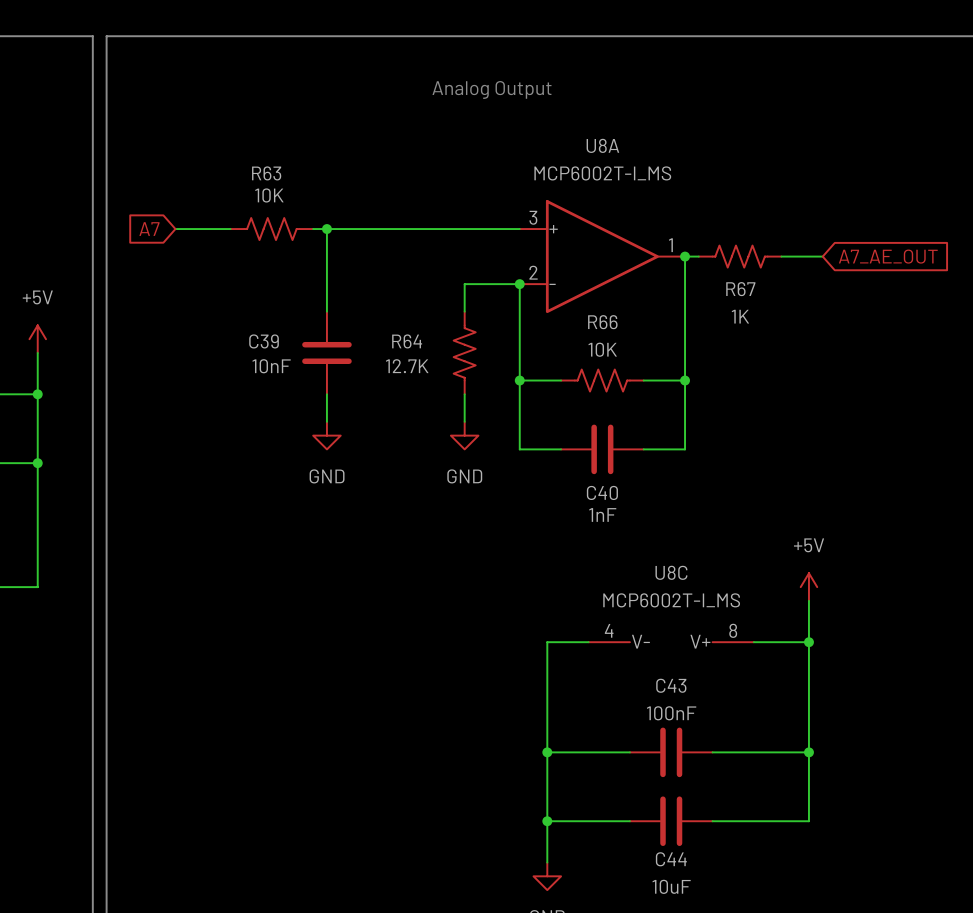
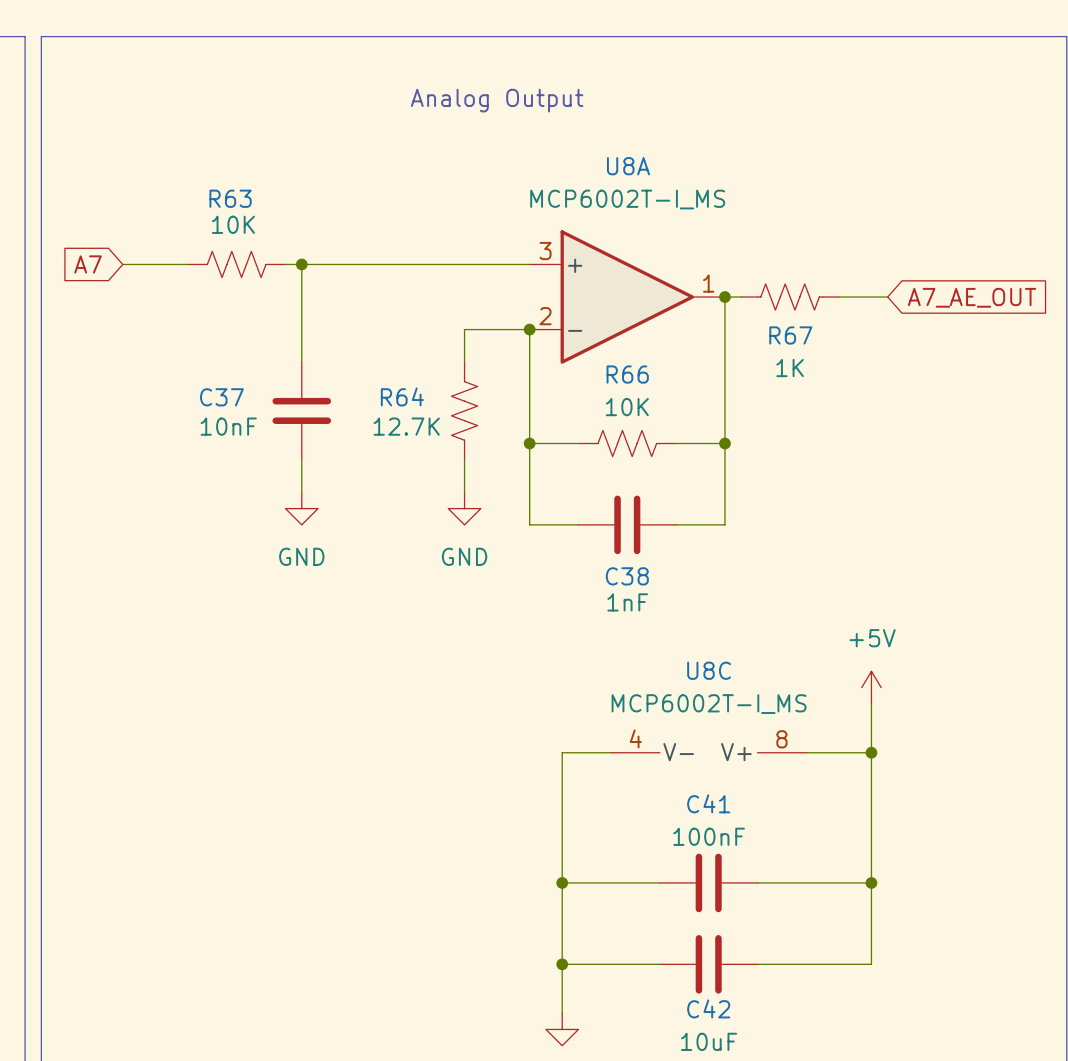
C39 name: C39 (264, 341) -> C37 (221, 397)
C40 name: C40 (602, 492) -> C38 (627, 576)
C43 name: C43 (671, 685) -> C41 (708, 803)
C44 name: C44 (671, 859) -> C42 (708, 1008)

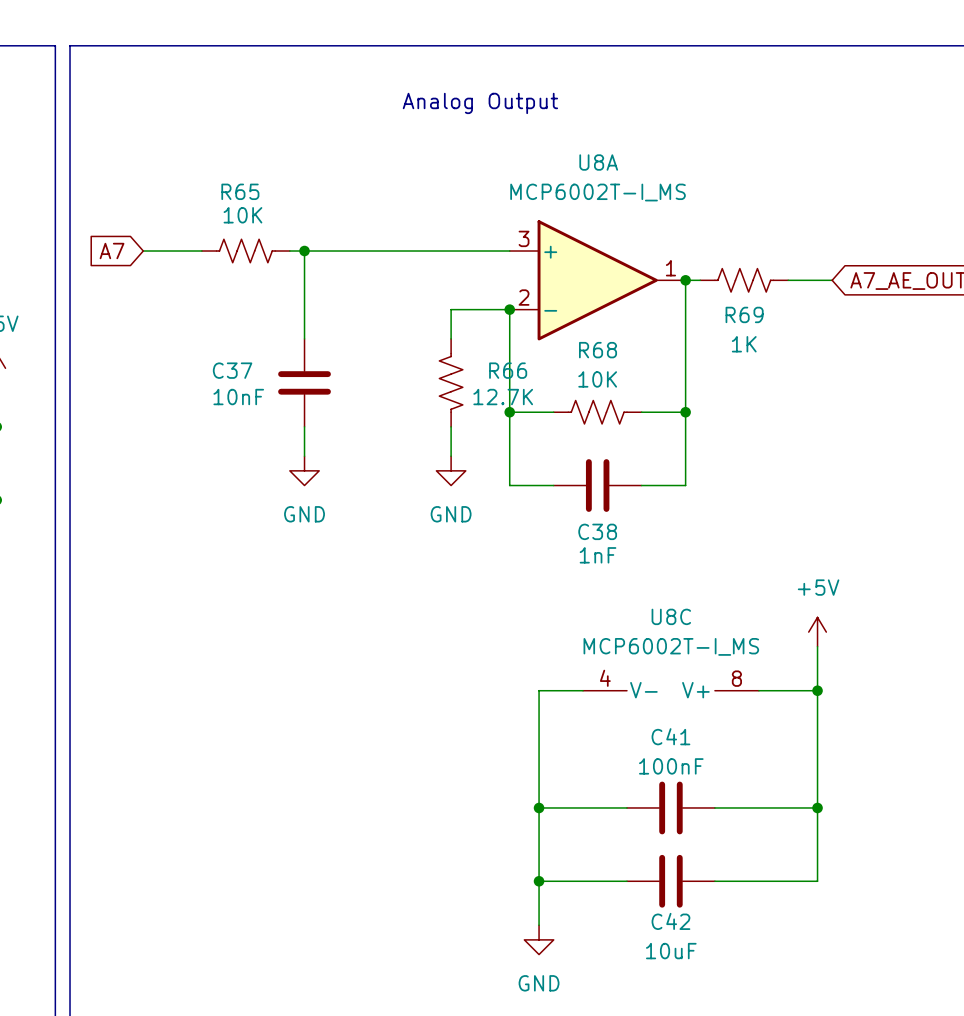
R63 name: R63 (230, 198) -> R65 (240, 191)
R67 name: R67 (790, 335) -> R69 (744, 314)
R66 name: R66 (627, 374) -> R68 (598, 350)
R64: 12.7K (464, 410) -> none
R66: none -> 12.7K (451, 382)

